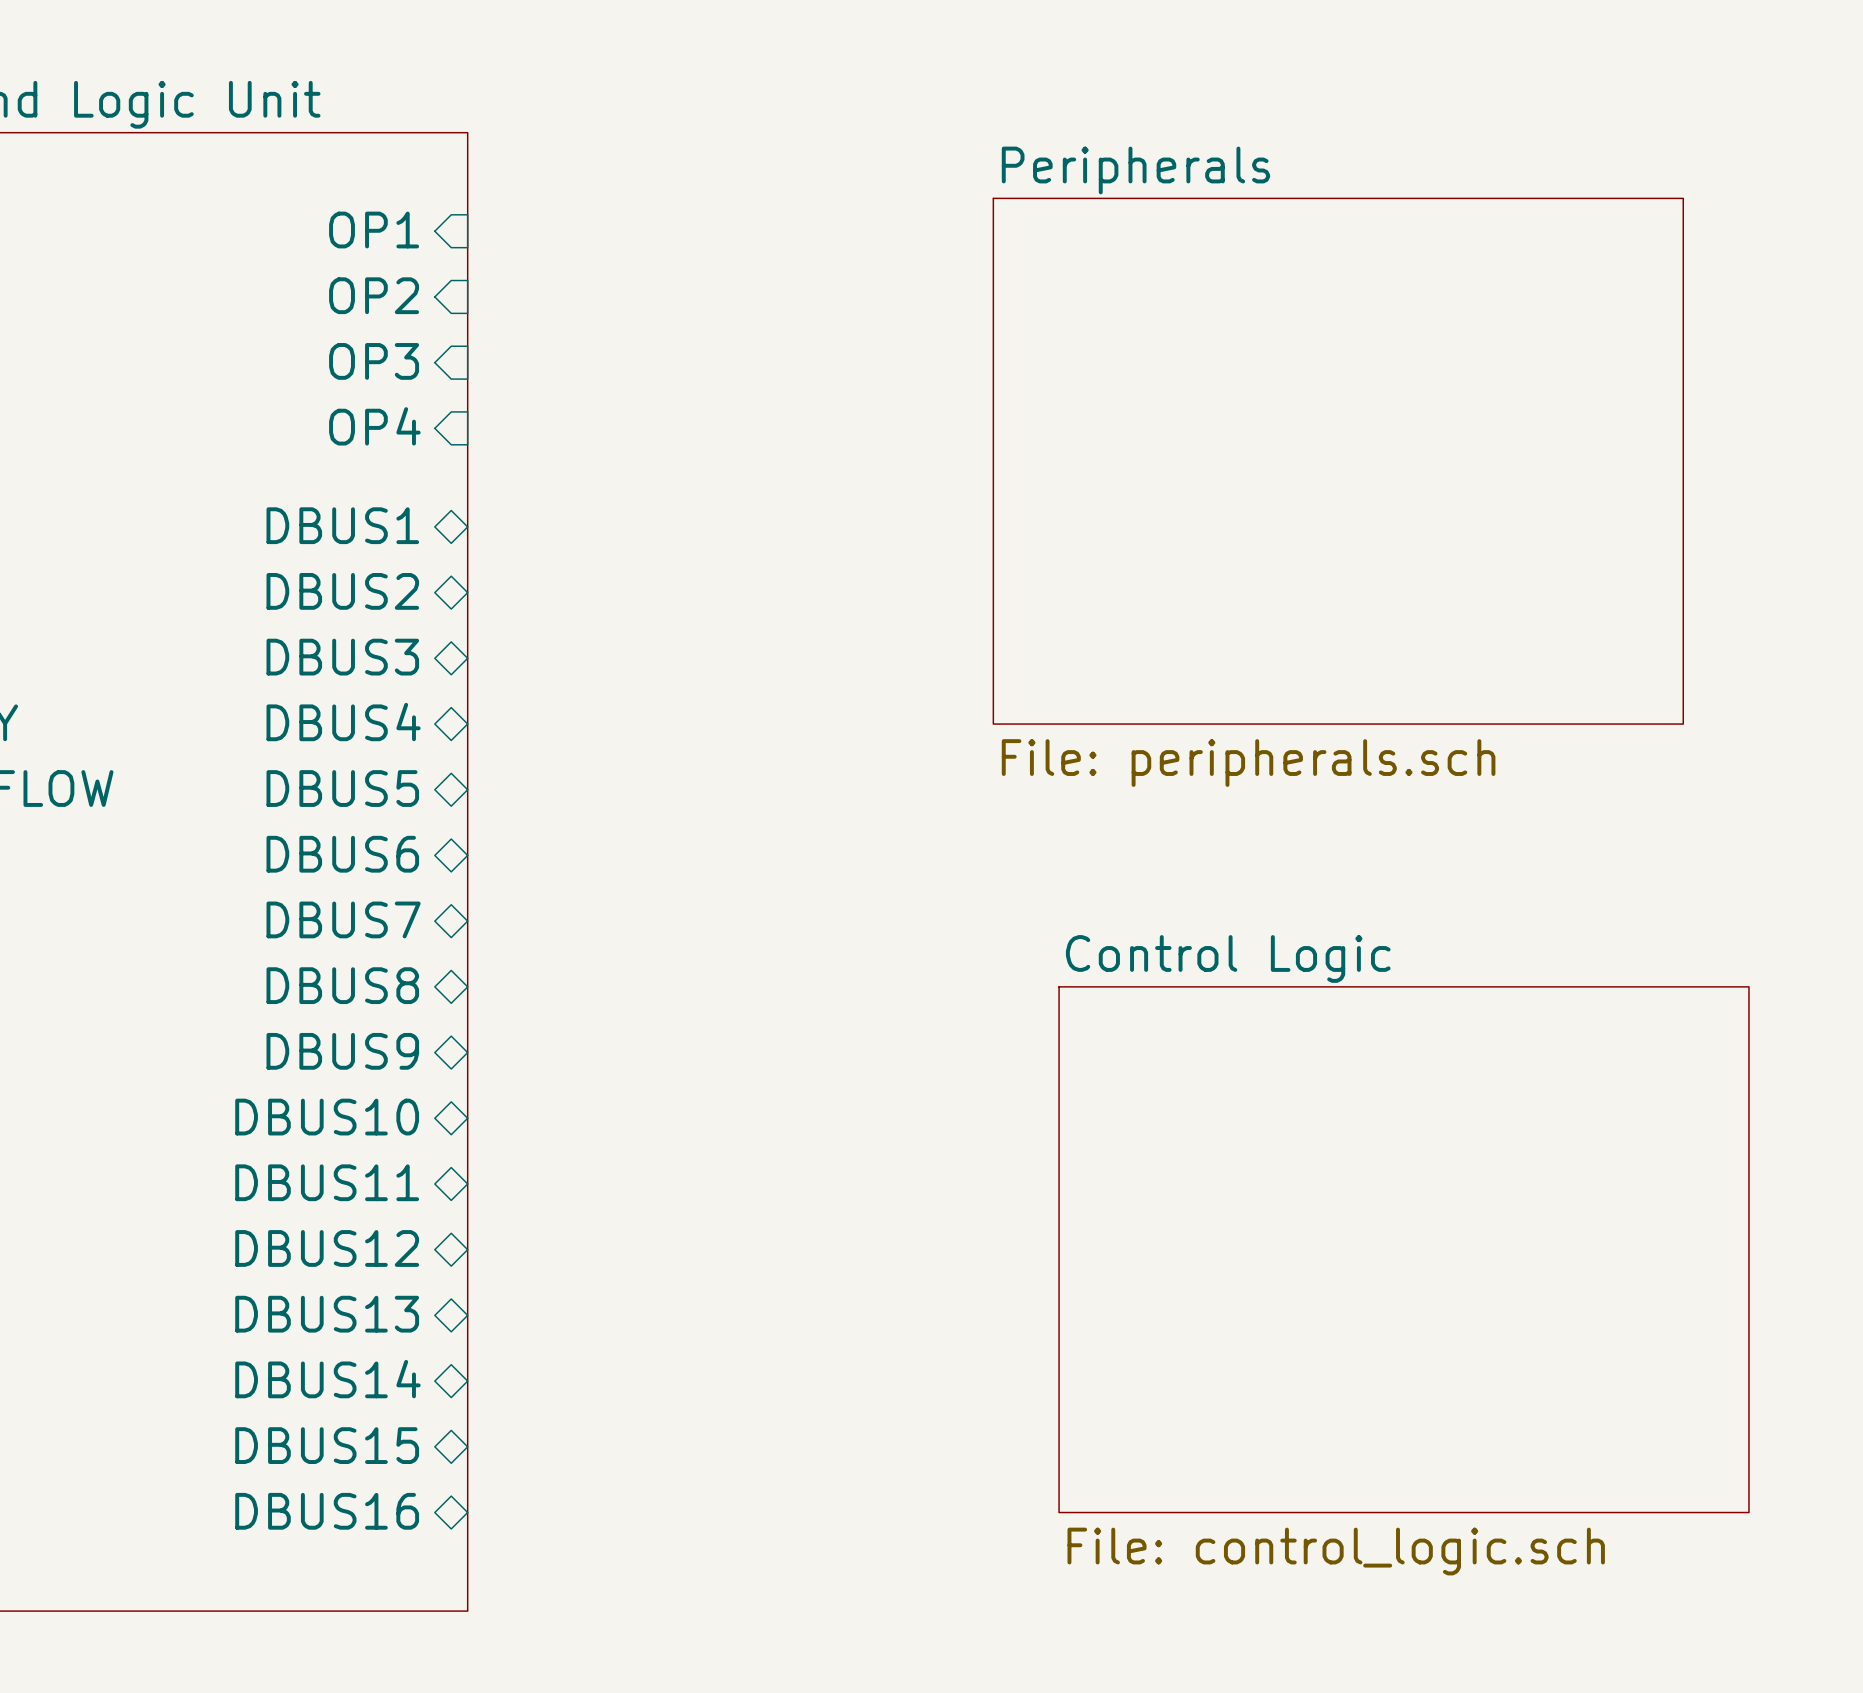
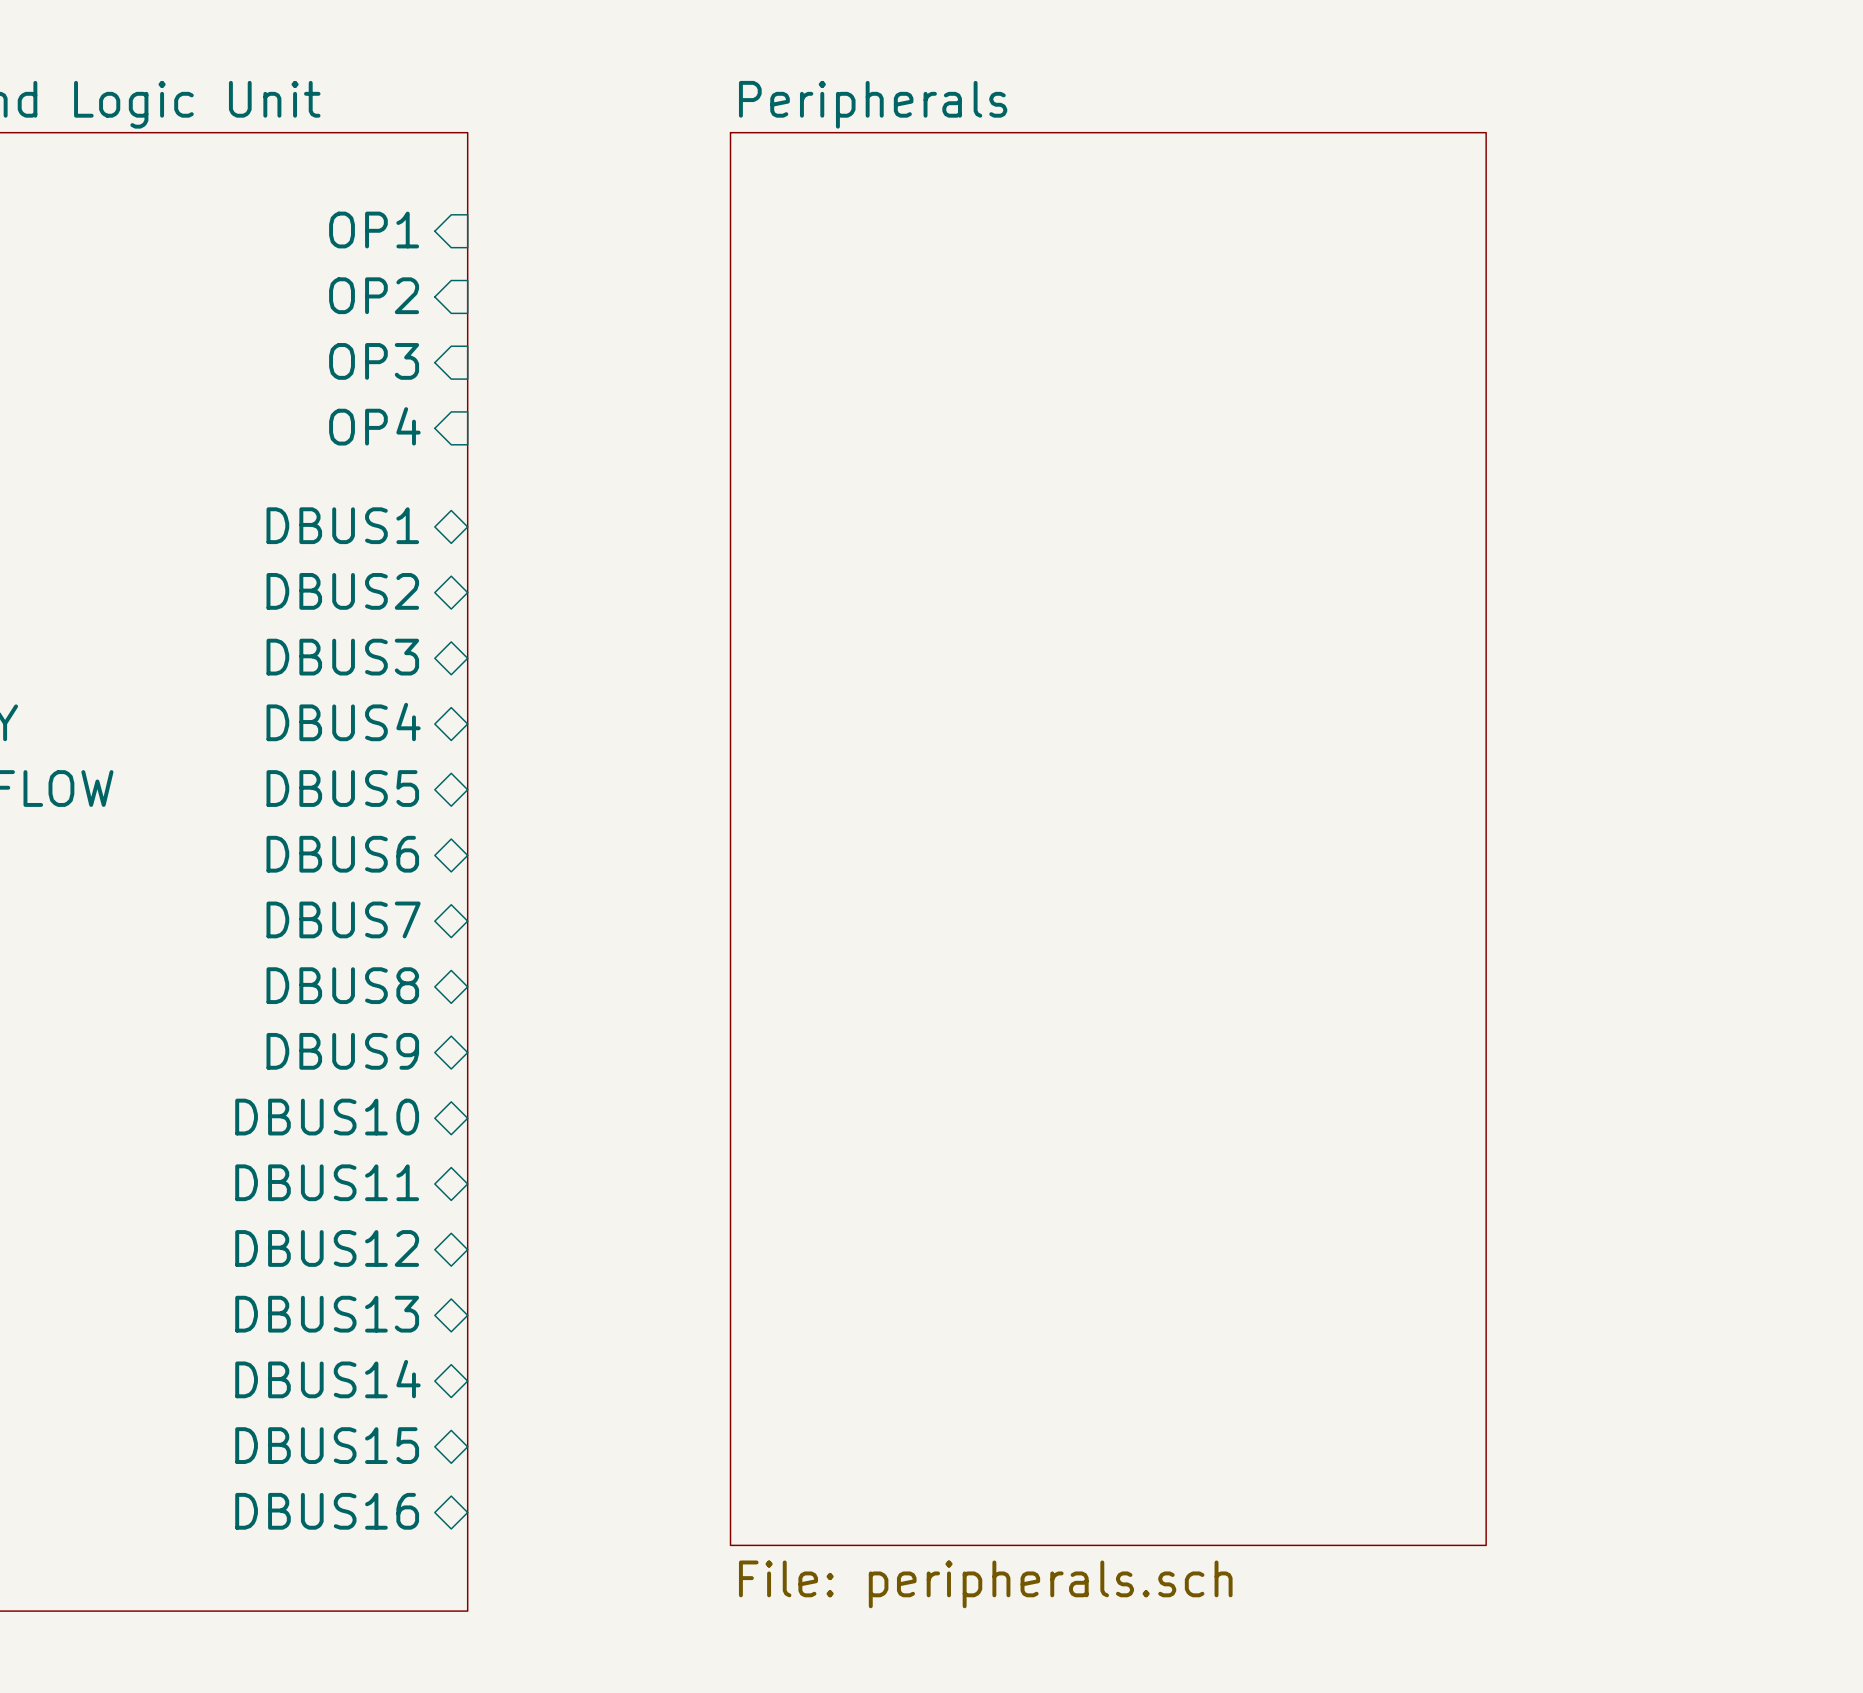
sheet Peripherals: File: peripherals.sch (1338, 461) -> none
sheet Peripherals: none -> File: peripherals.sch (1108, 839)
sheet Control Logic: File: control_logic.sch (1404, 1249) -> none

